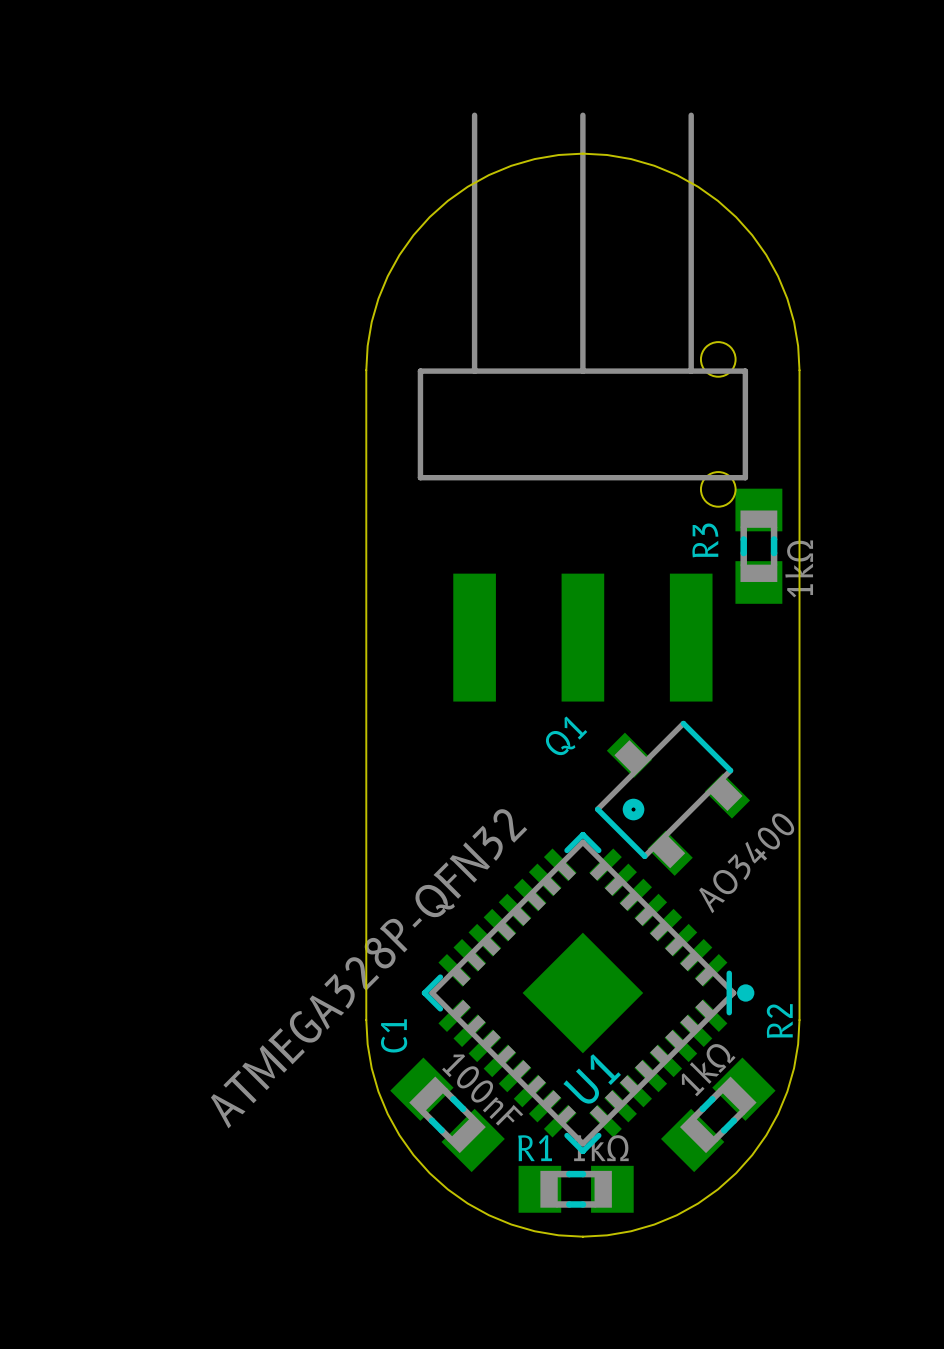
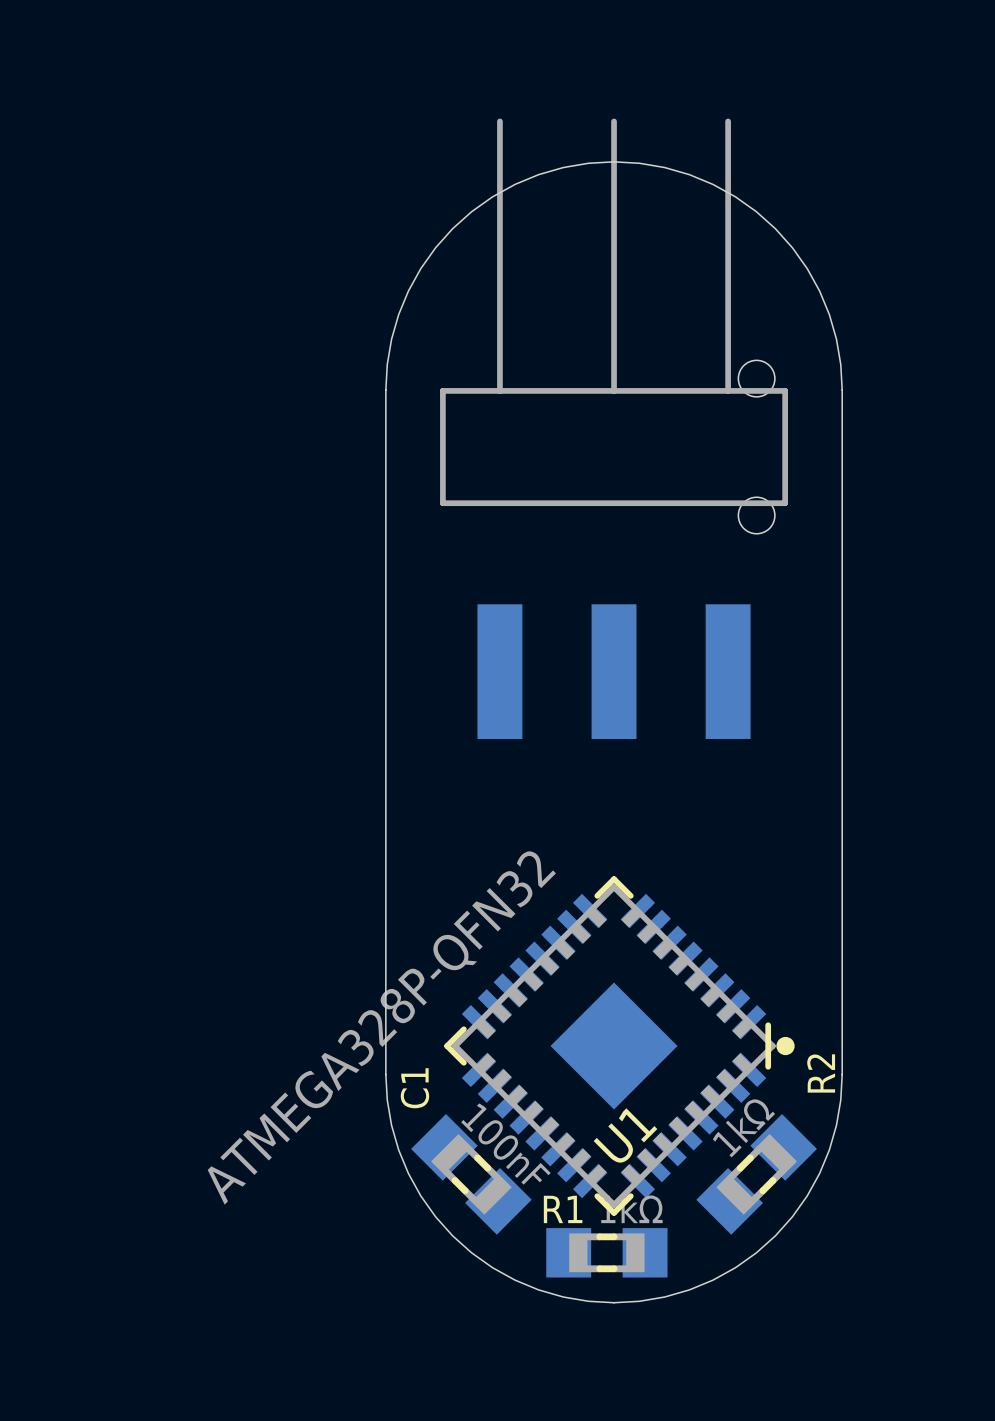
R3: 1kΩ (758, 546) -> none
Q1: AO3400 (672, 798) -> none

